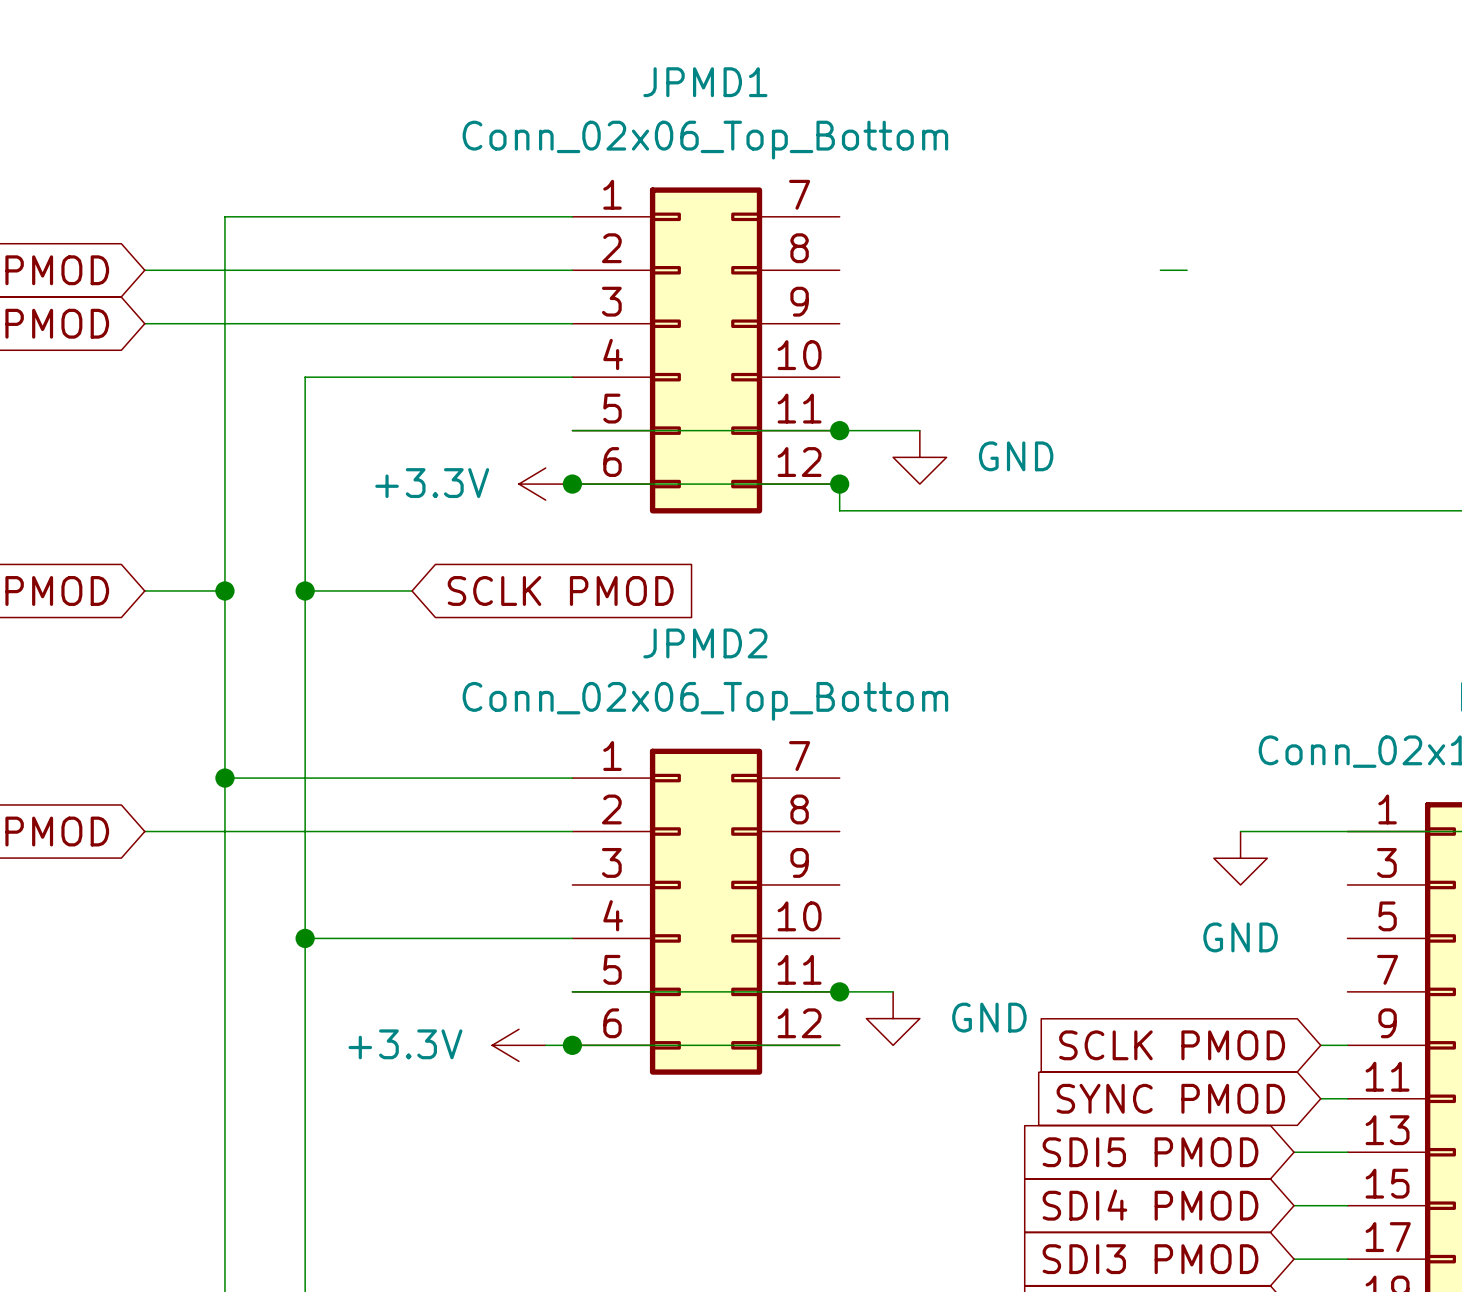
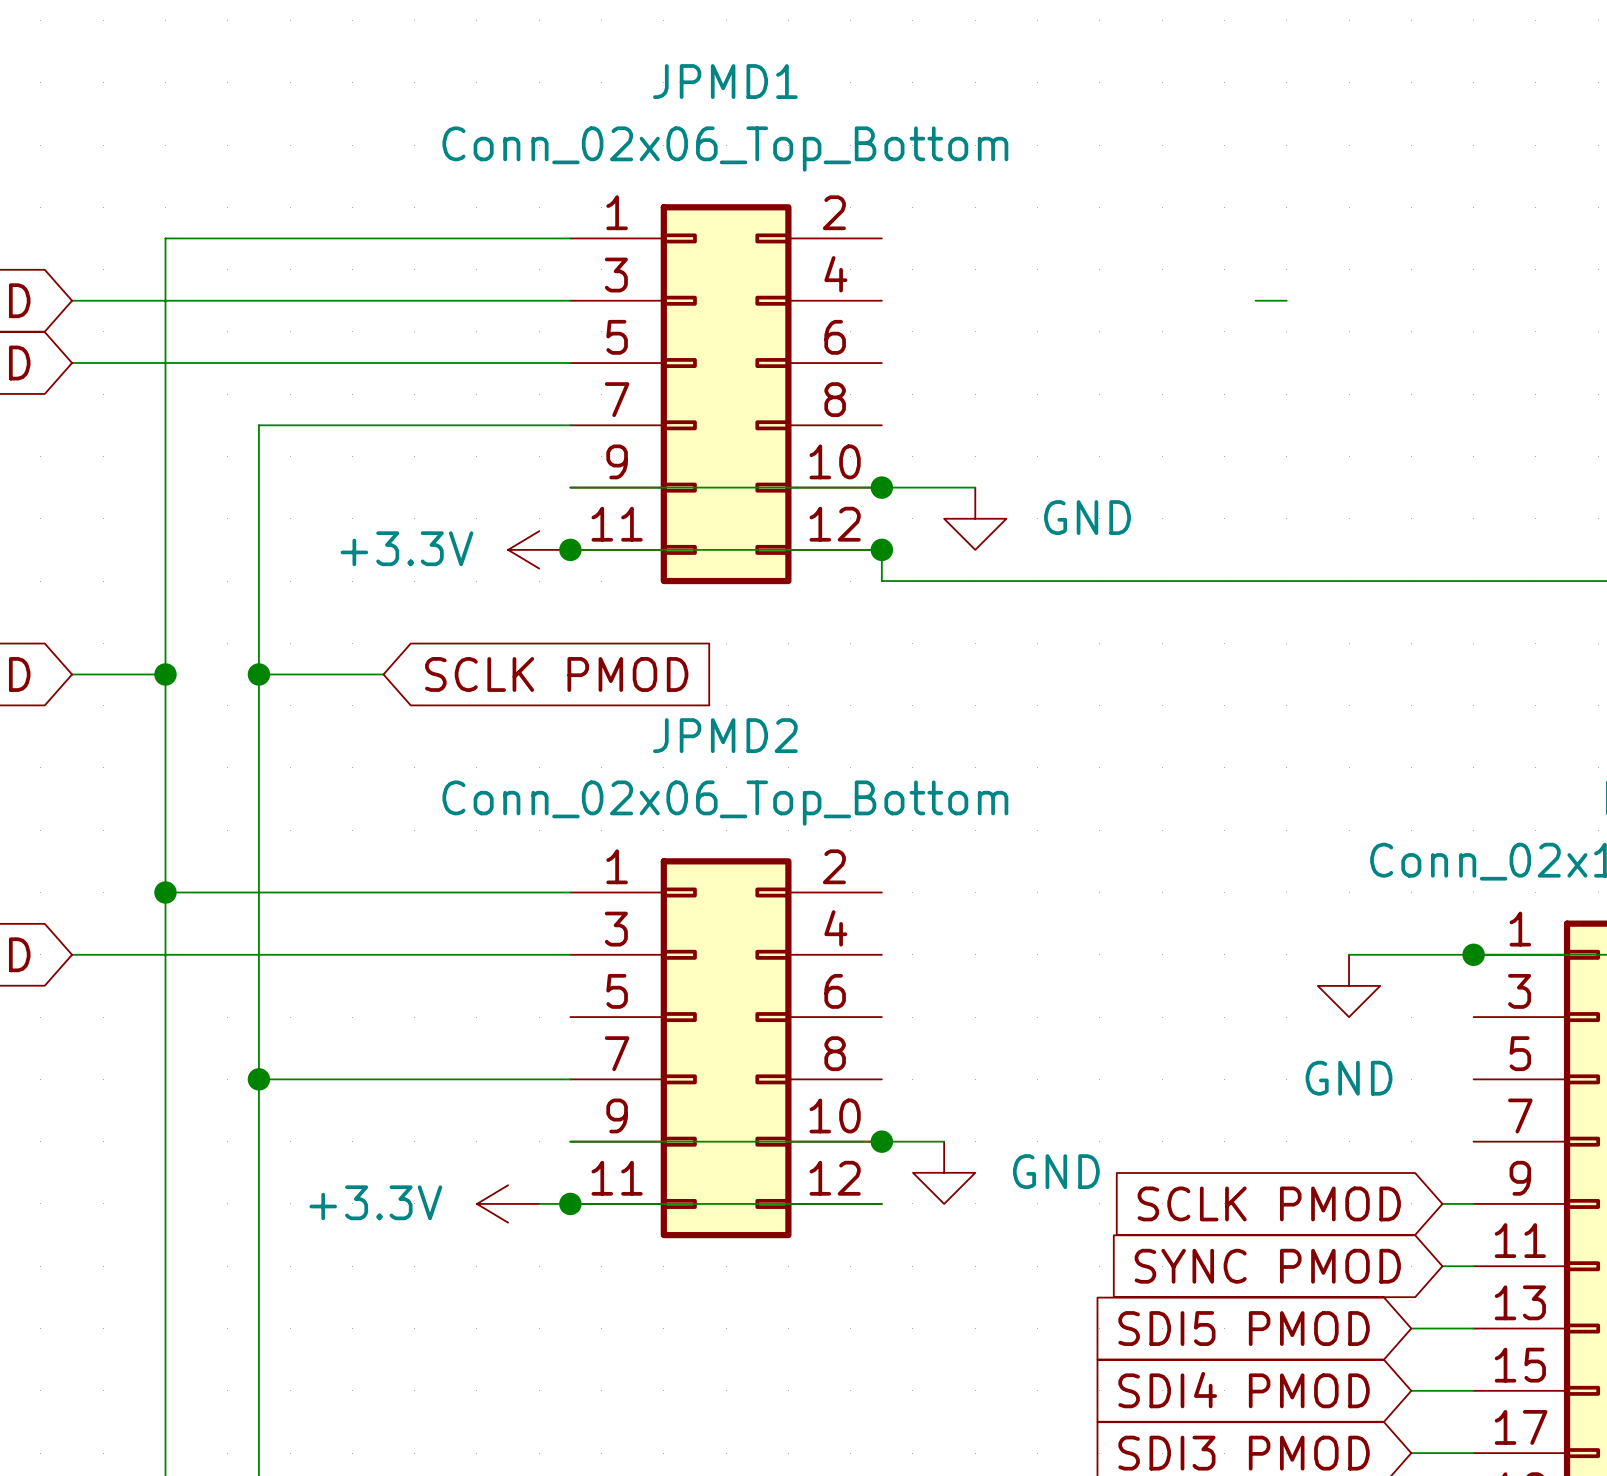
JPMD1 symbol: [572, 187, 840, 514] -> [570, 204, 882, 585]
JPMD2 symbol: [572, 748, 840, 1075] -> [570, 858, 882, 1239]
junction: none -> (1473, 954)

